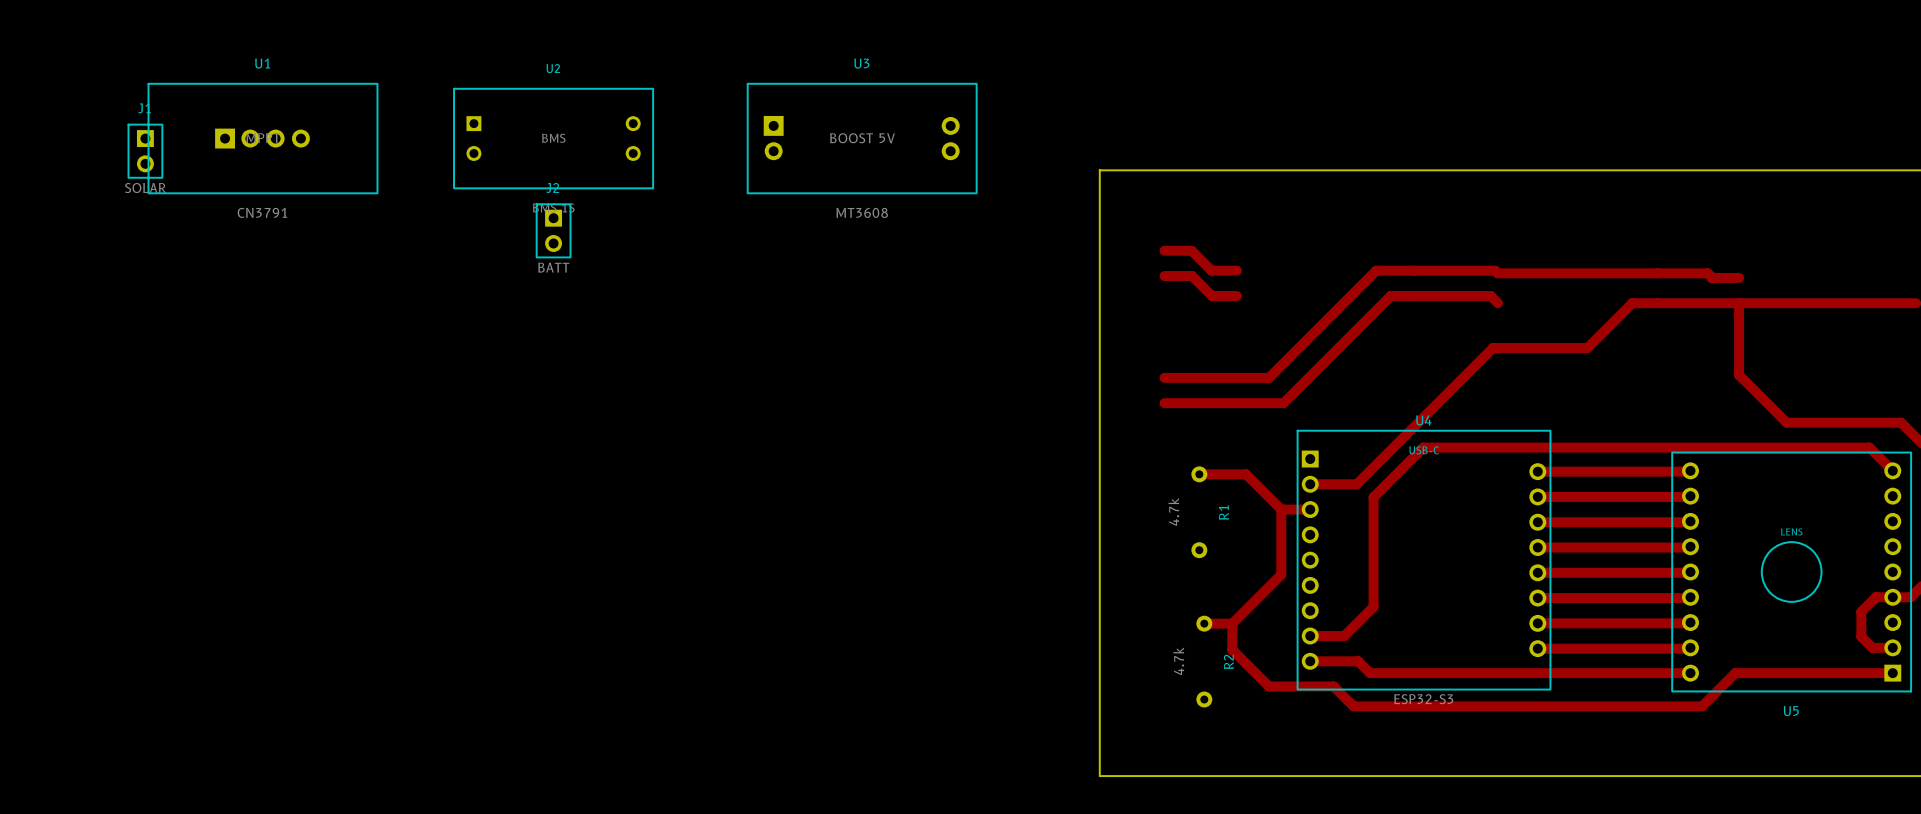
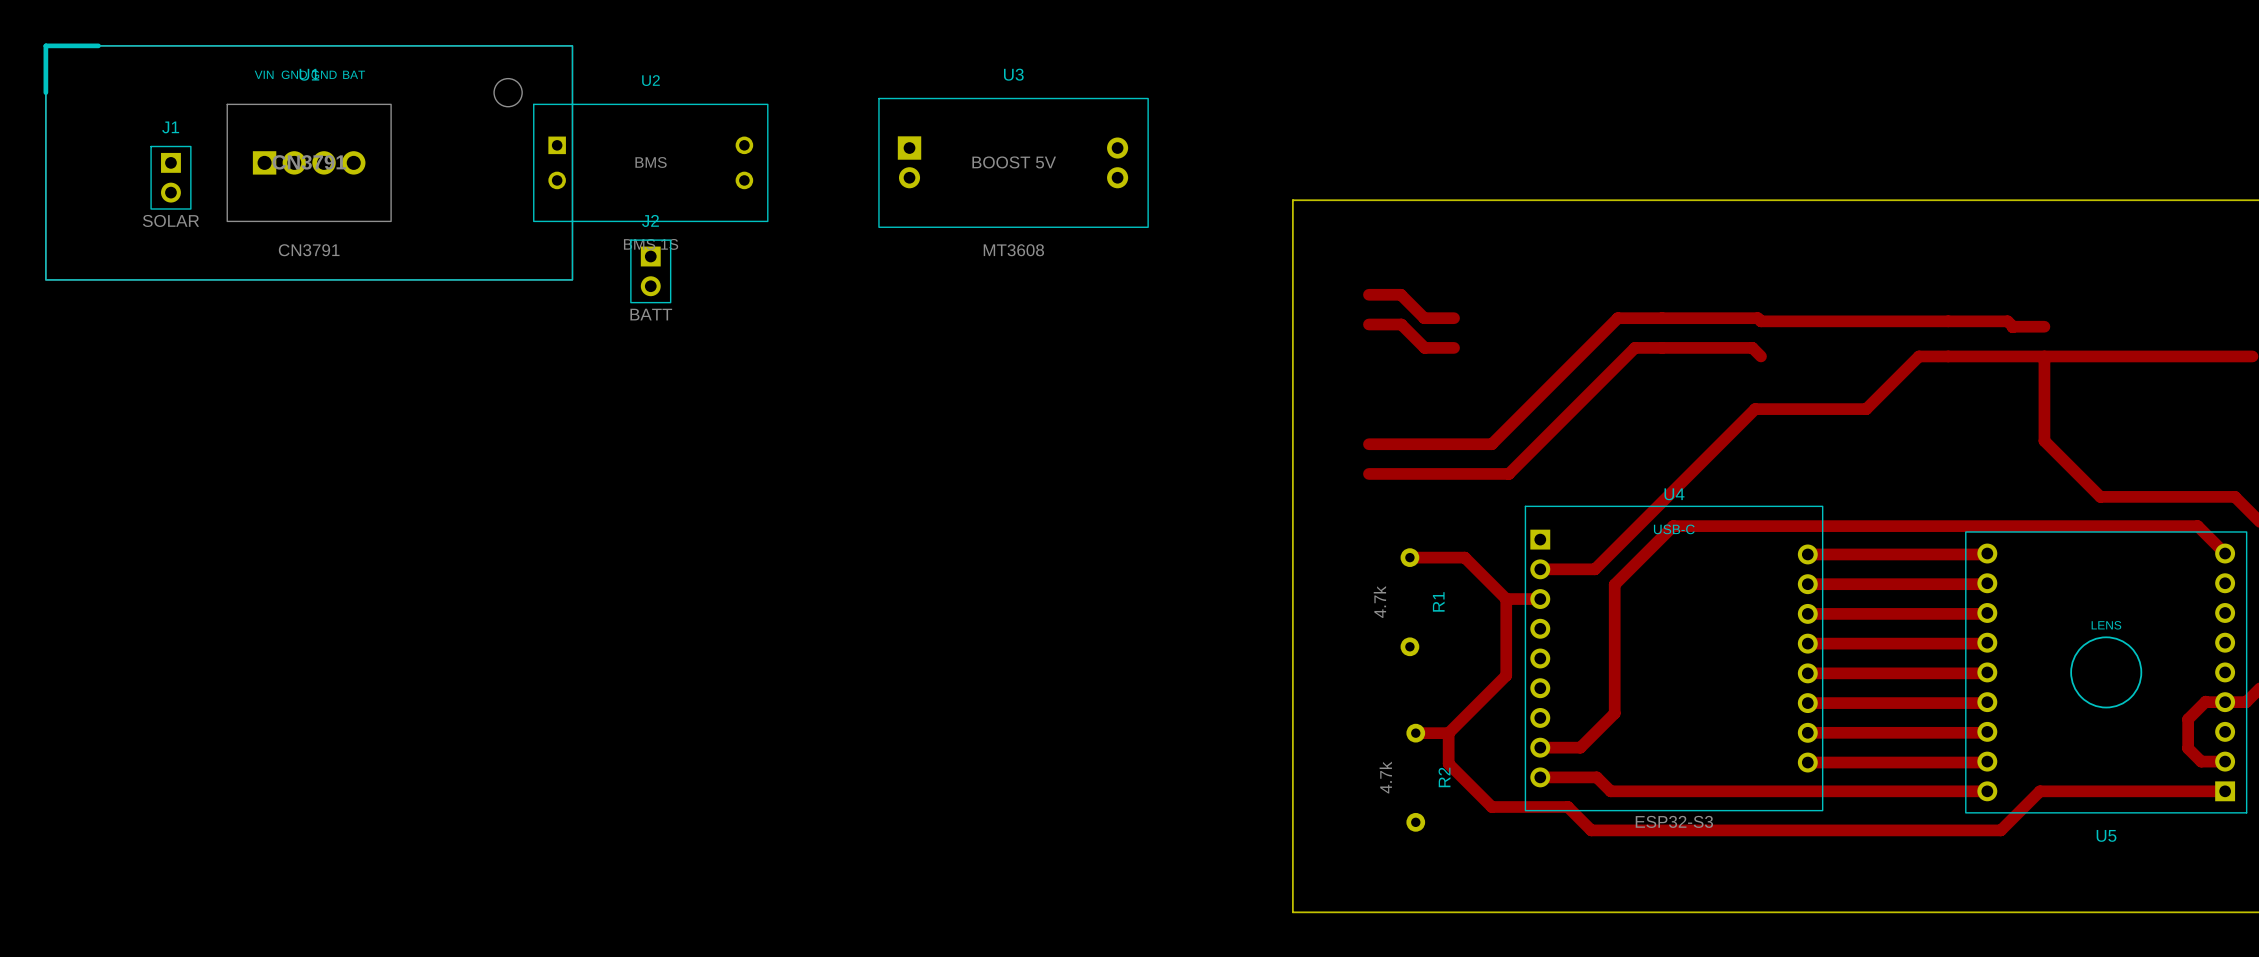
U1 footprint: [147, 83, 379, 194] -> [43, 43, 574, 281]

